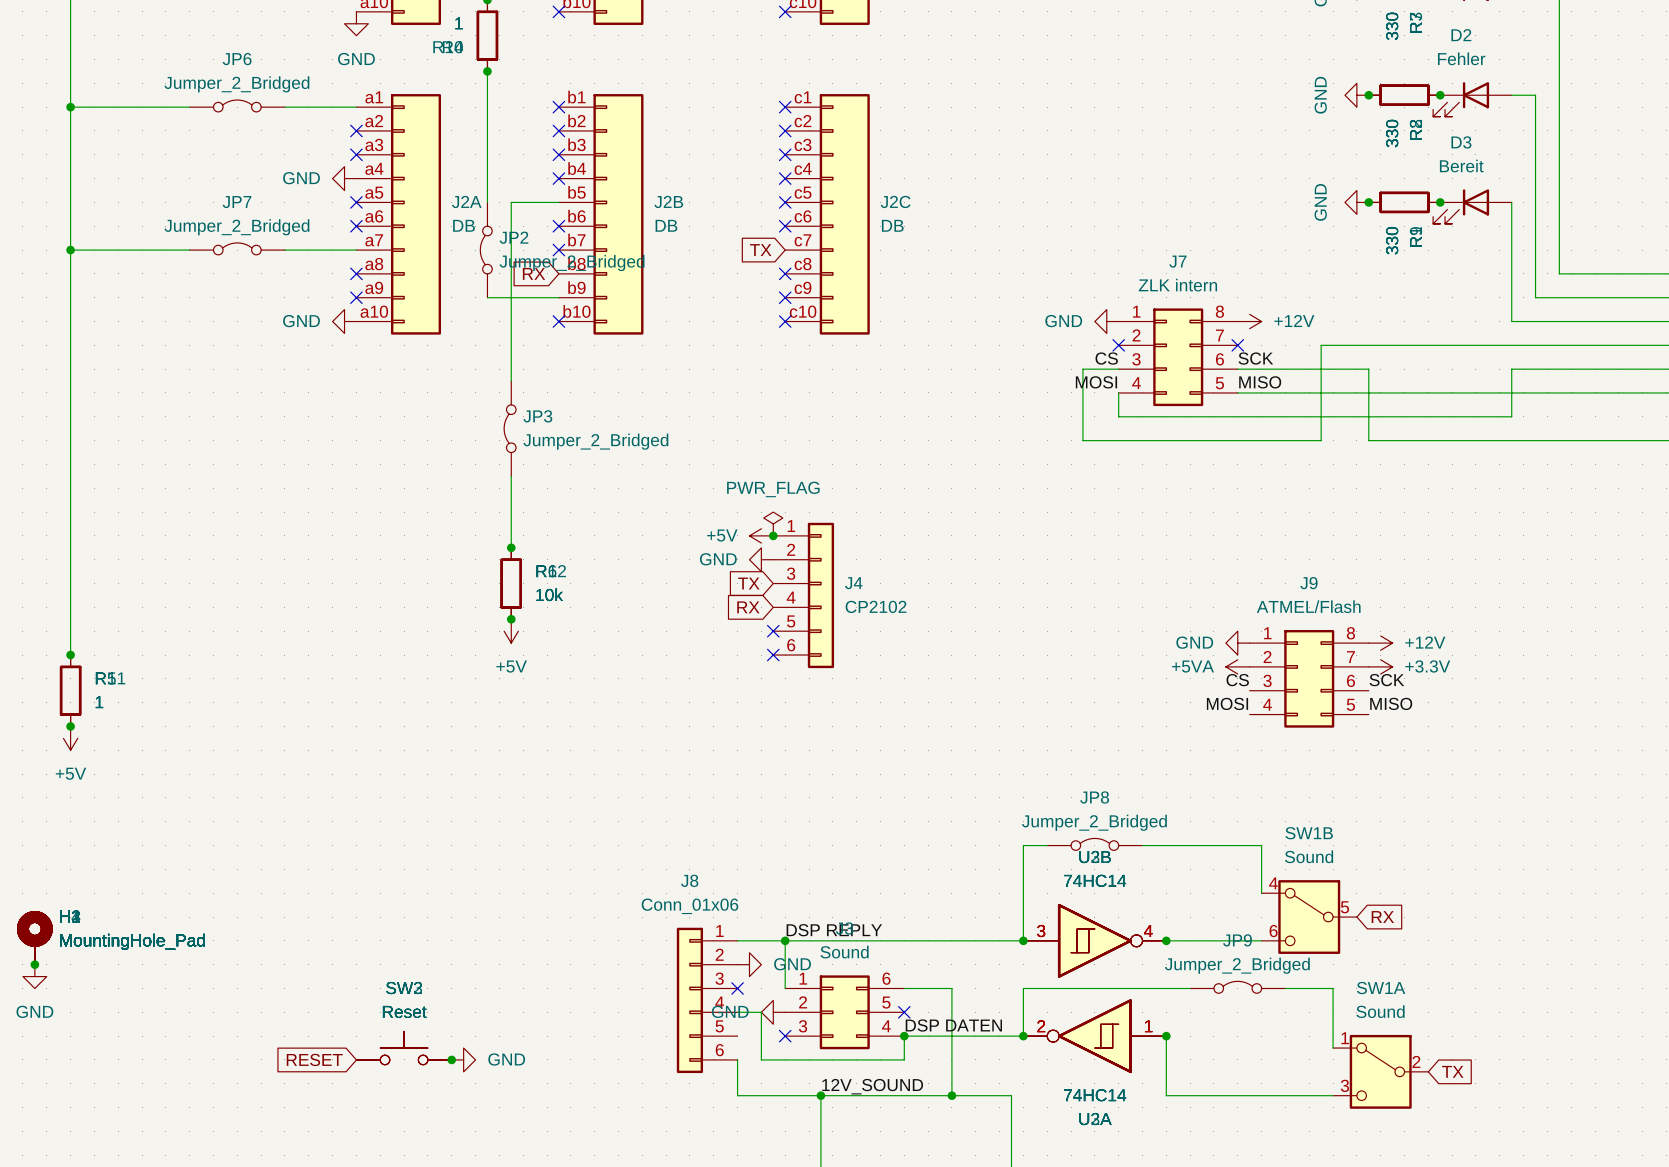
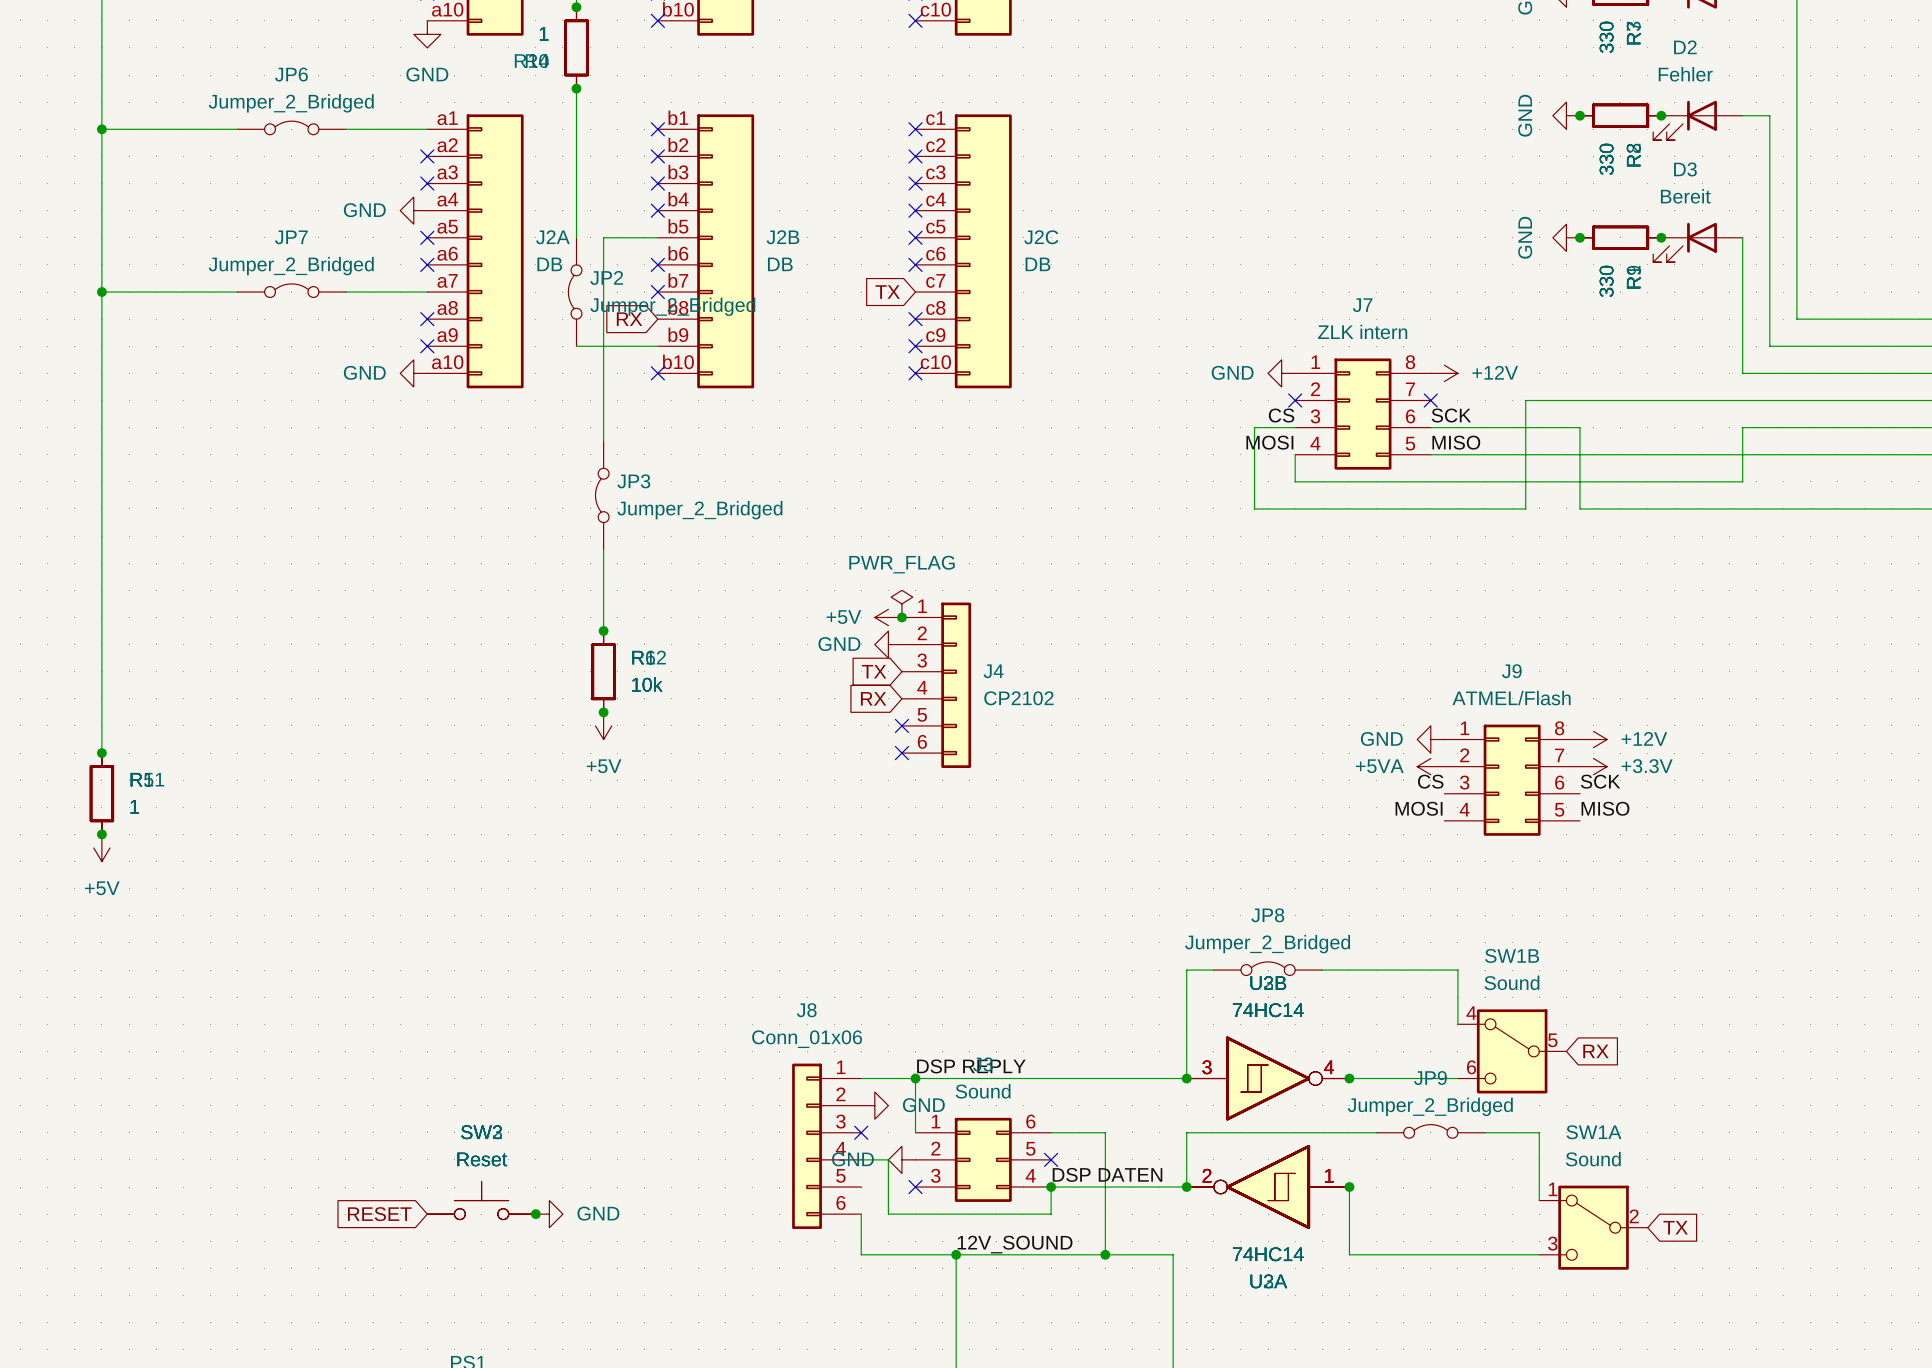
part: MountingHole_Pad (34, 937) -> none
part: MountingHole_Pad (34, 937) -> none
part: MountingHole_Pad (34, 937) -> none
part: MountingHole_Pad (34, 937) -> none
junction: (34, 964) -> none
power symbol: GND (34, 976) -> none

